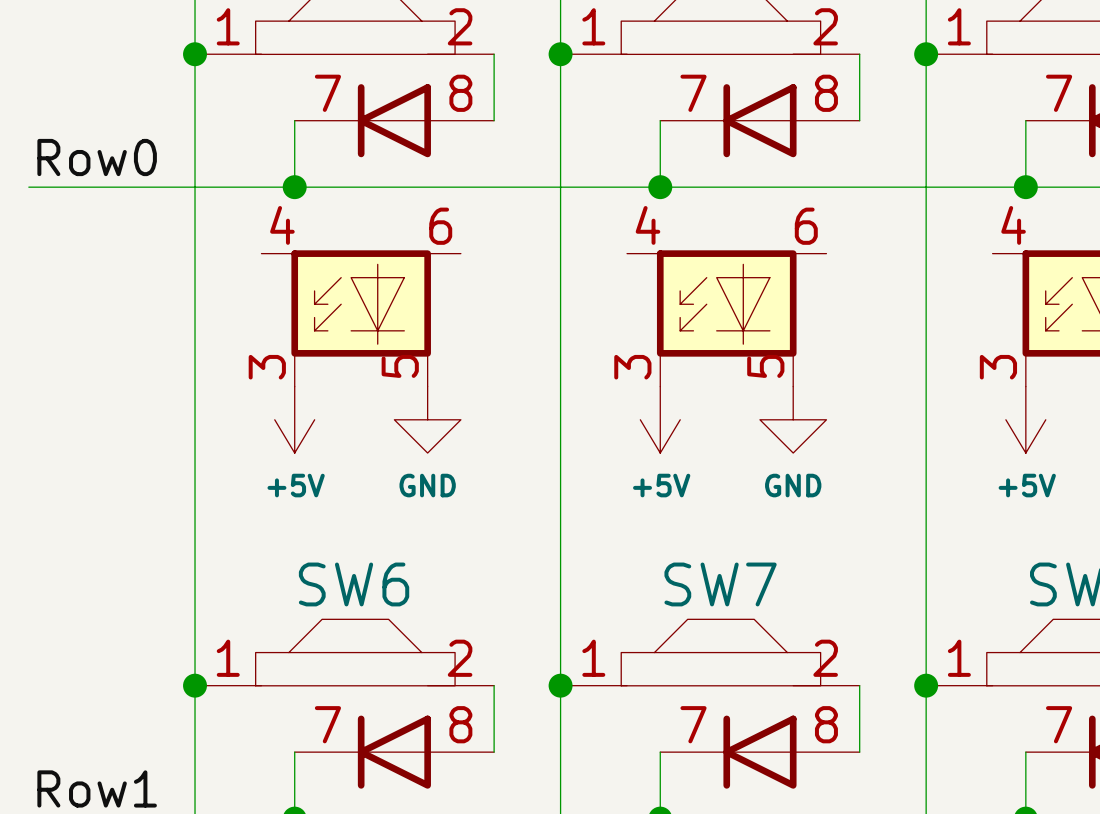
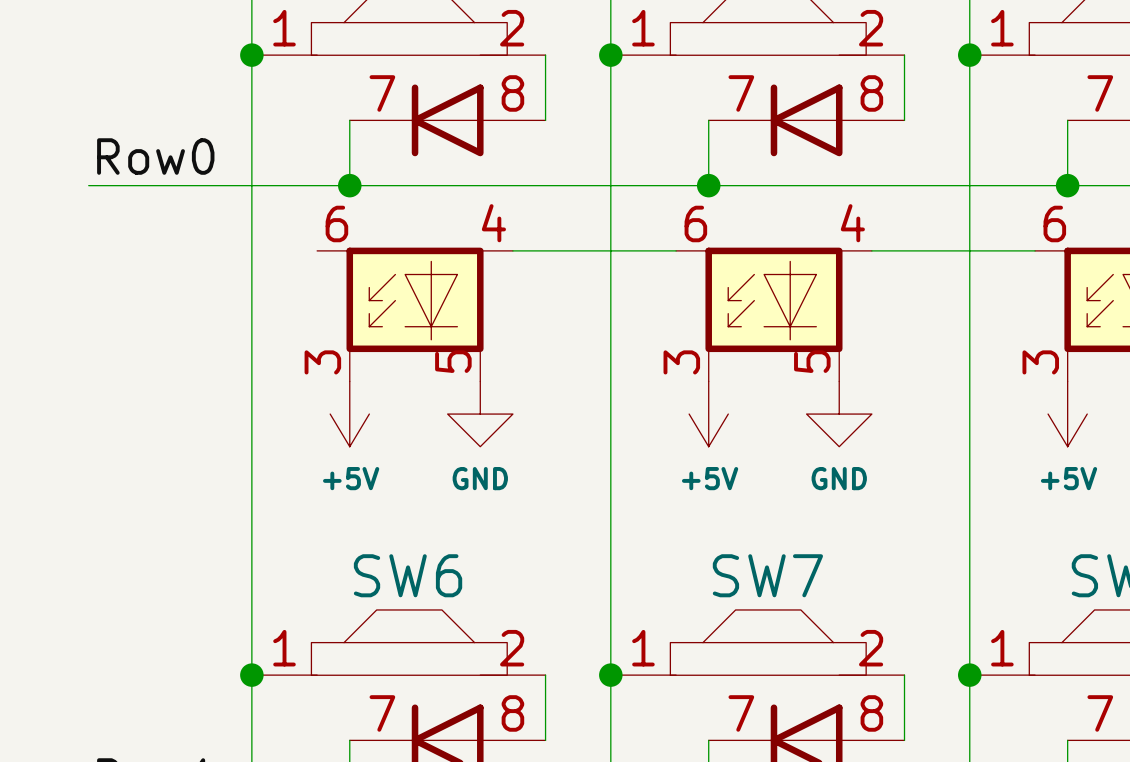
part pin number: 4 (282, 225) -> 6 (336, 223)
part pin number: 4 (647, 225) -> 6 (695, 223)
part pin number: 4 (1013, 225) -> 6 (1054, 223)
part pin number: 6 (440, 226) -> 4 (493, 223)
part pin number: 6 (806, 226) -> 4 (852, 223)
wire: none -> (512, 250) (676, 250)
wire: none -> (871, 250) (1035, 250)

